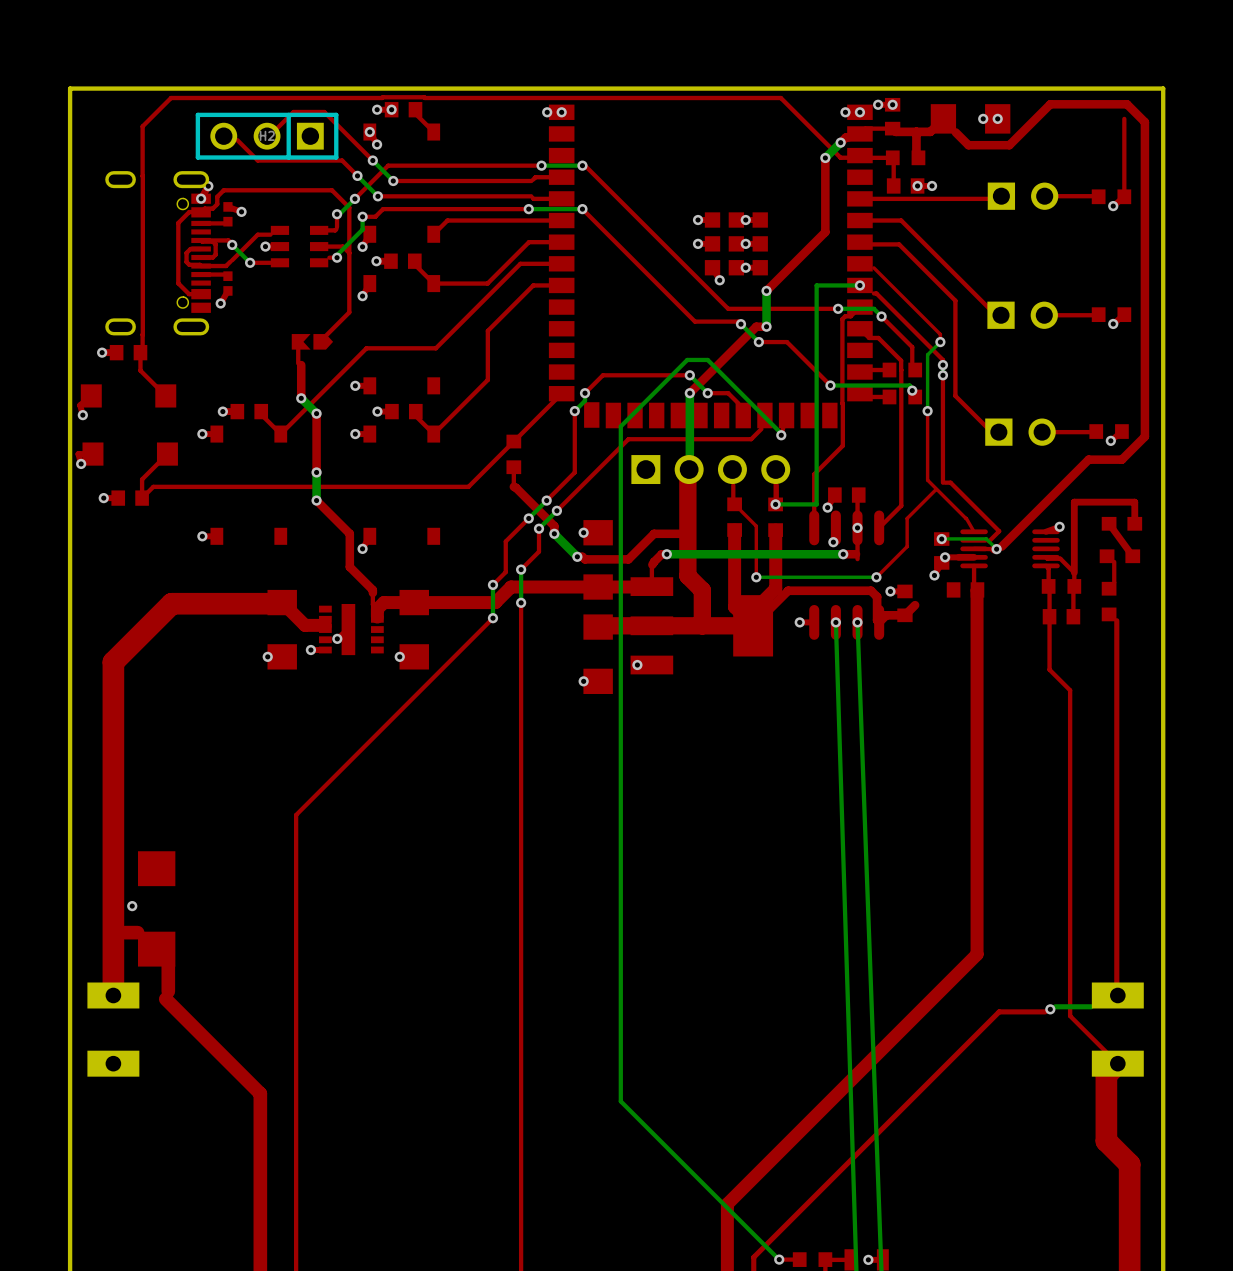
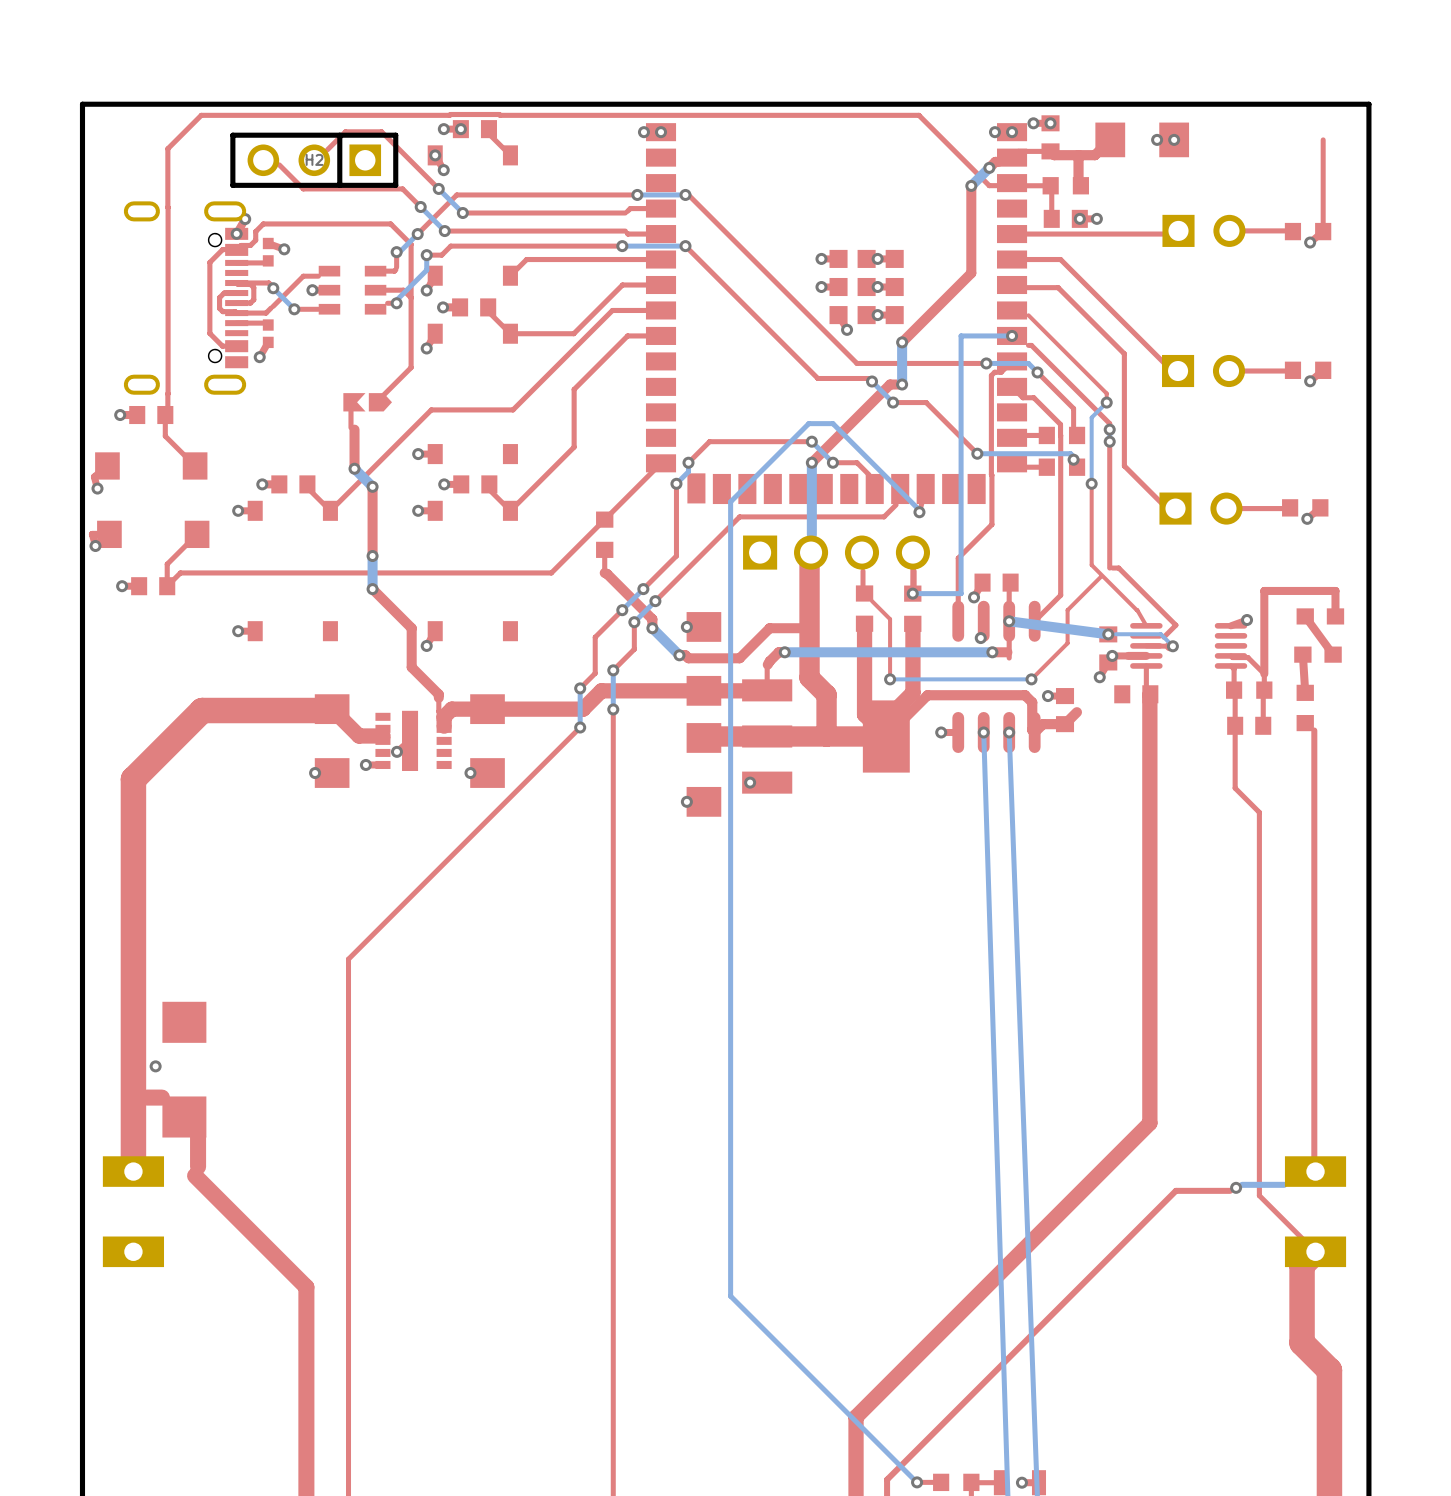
top track: (955, 132) (968, 145) (1009, 145) (1050, 104) (1127, 104) (1144, 122) (1144, 436) (1121, 459) (1088, 459) (1001, 546) -> none
bottom track: none -> (1009, 621) (1108, 634)
top track: none -> (1302, 654) (1305, 692)
top track: (1114, 561) (1114, 582) -> none

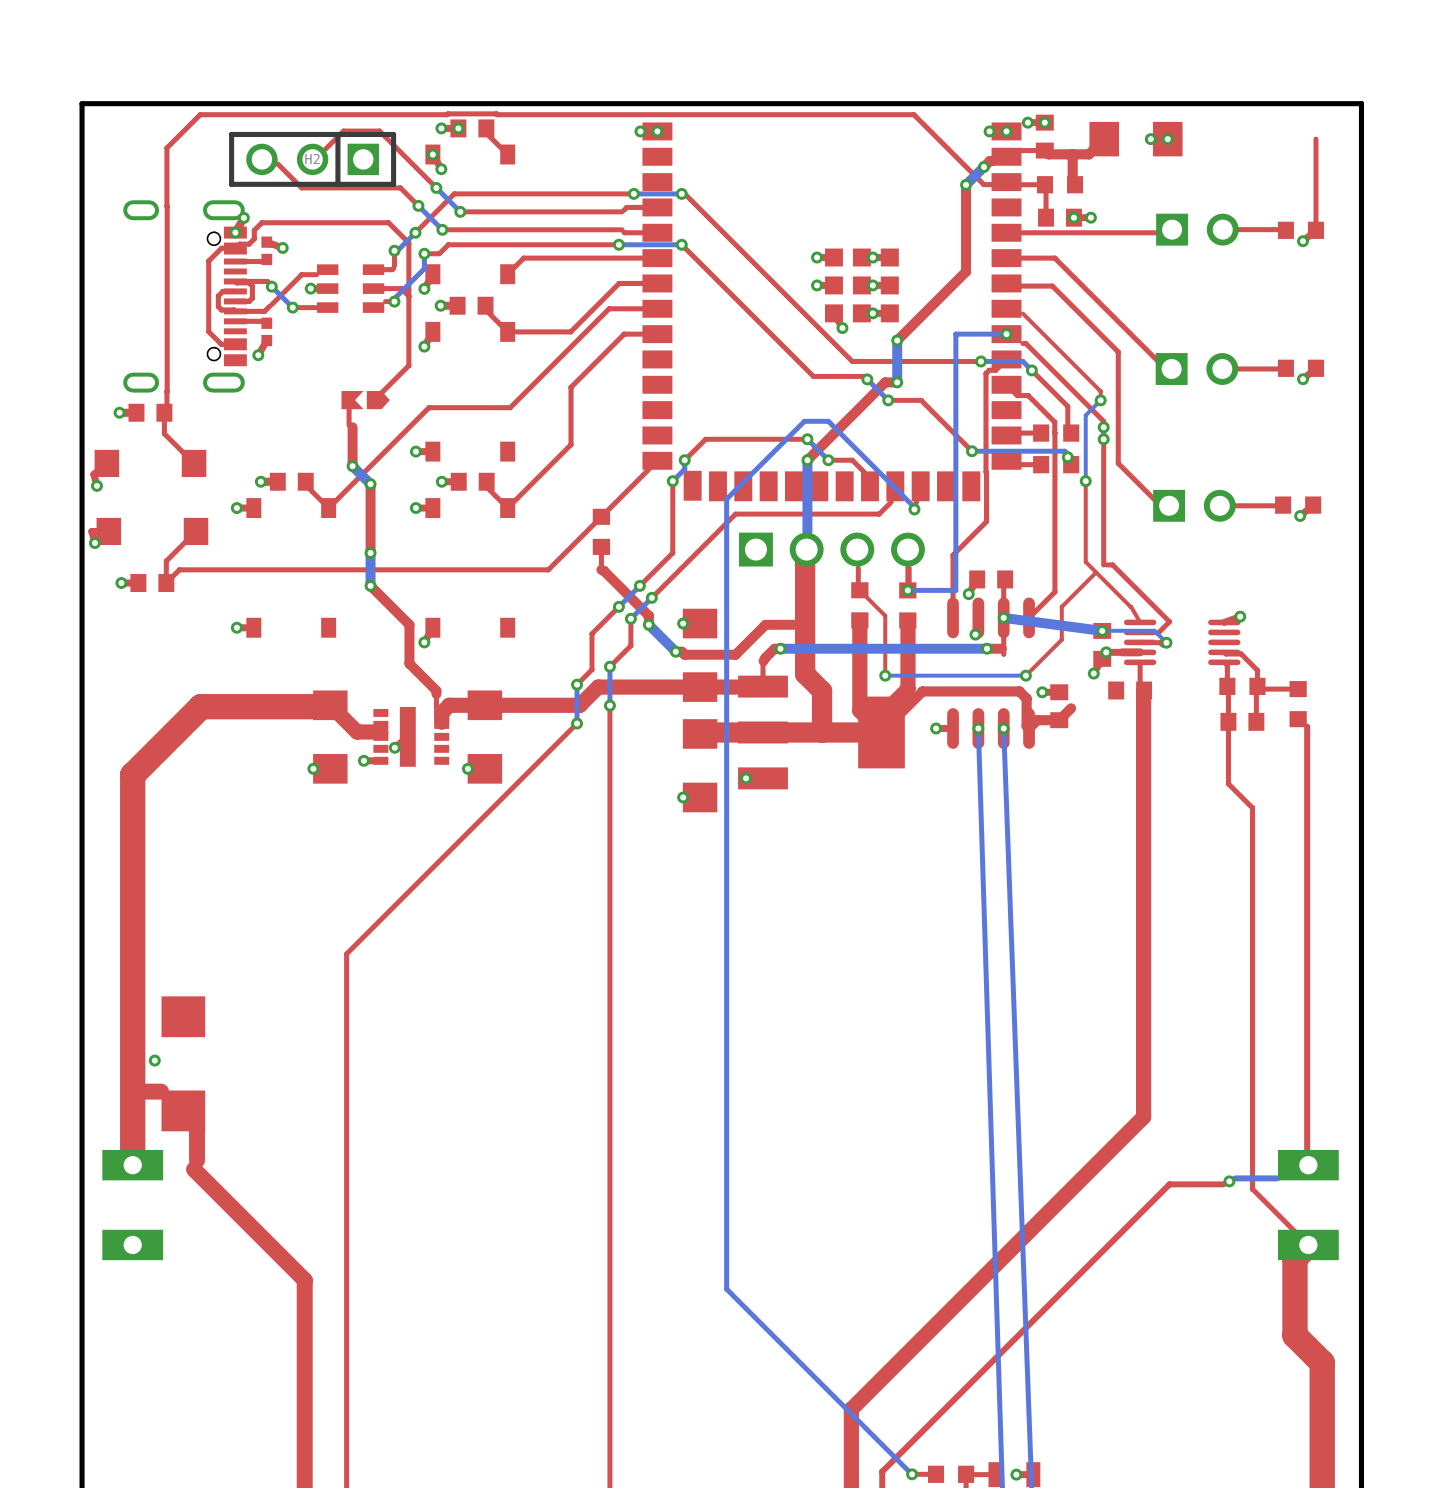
top track: (1305, 616) (1333, 654) -> none
part: (1320, 616) -> none
top track: (1335, 616) (1335, 590) (1264, 590) (1264, 673) -> none
top track: (1302, 654) (1305, 692) -> (1260, 689) (1298, 689)
part: (1317, 654) -> none

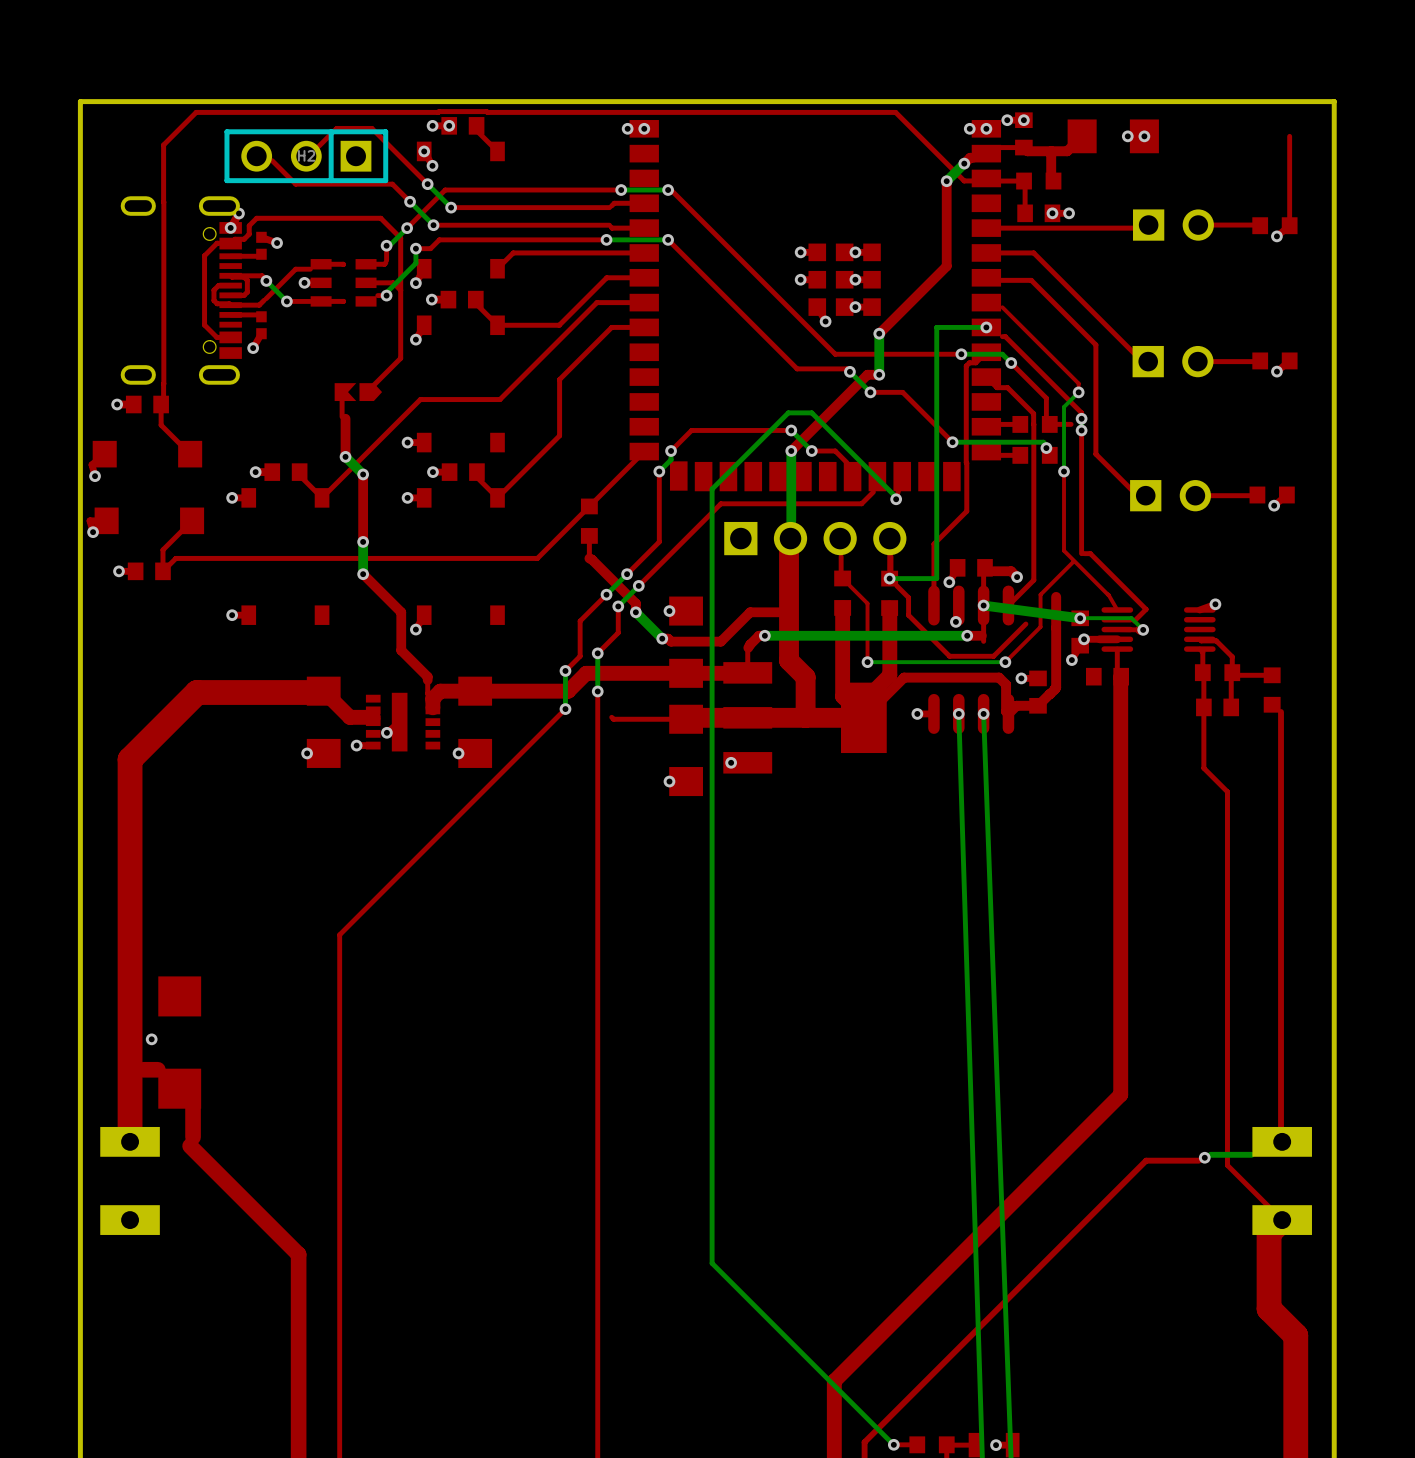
top track: none -> (321, 264) (343, 264)
top track: none -> (343, 301) (321, 301)
top track: none -> (1071, 424) (1049, 424)
top track: none -> (993, 571) (1011, 571) (1017, 577)
via: none -> (1017, 577)
top track: none -> (896, 585) (908, 597) (908, 615) (949, 656) (993, 656) (1025, 624)
top track: none -> (1056, 596) (1056, 687) (1049, 694)
top track: none -> (611, 717) (613, 719) (686, 719)

